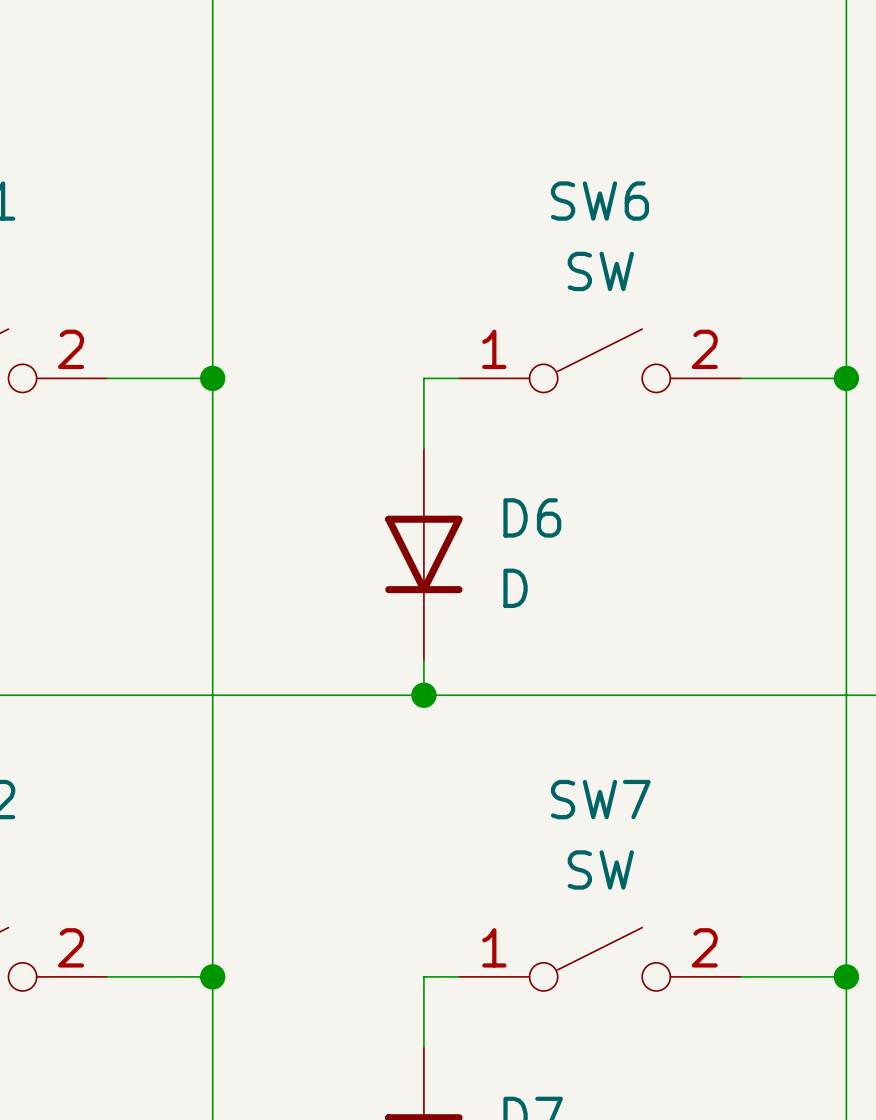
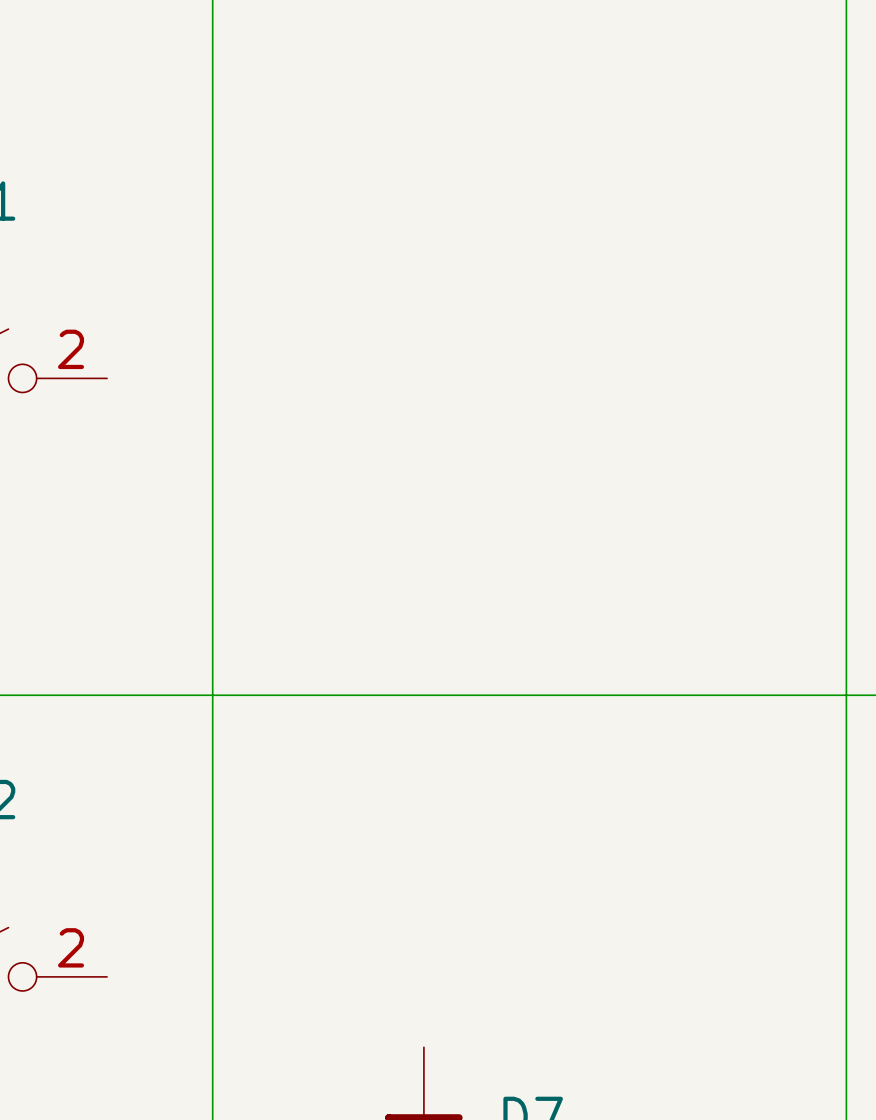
SW6: SW (599, 360) -> none
wire: (107, 378) (212, 378) -> none
junction: (212, 378) -> none
wire: (459, 378) (423, 378) (423, 448) -> none
wire: (740, 378) (846, 378) -> none
junction: (846, 378) -> none
D6: D (423, 554) -> none
wire: (423, 660) (423, 695) -> none
junction: (423, 695) -> none
SW7: SW (599, 959) -> none
wire: (107, 976) (212, 976) -> none
junction: (212, 976) -> none
wire: (459, 976) (423, 976) (423, 1047) -> none
wire: (740, 976) (846, 976) -> none
junction: (846, 976) -> none

